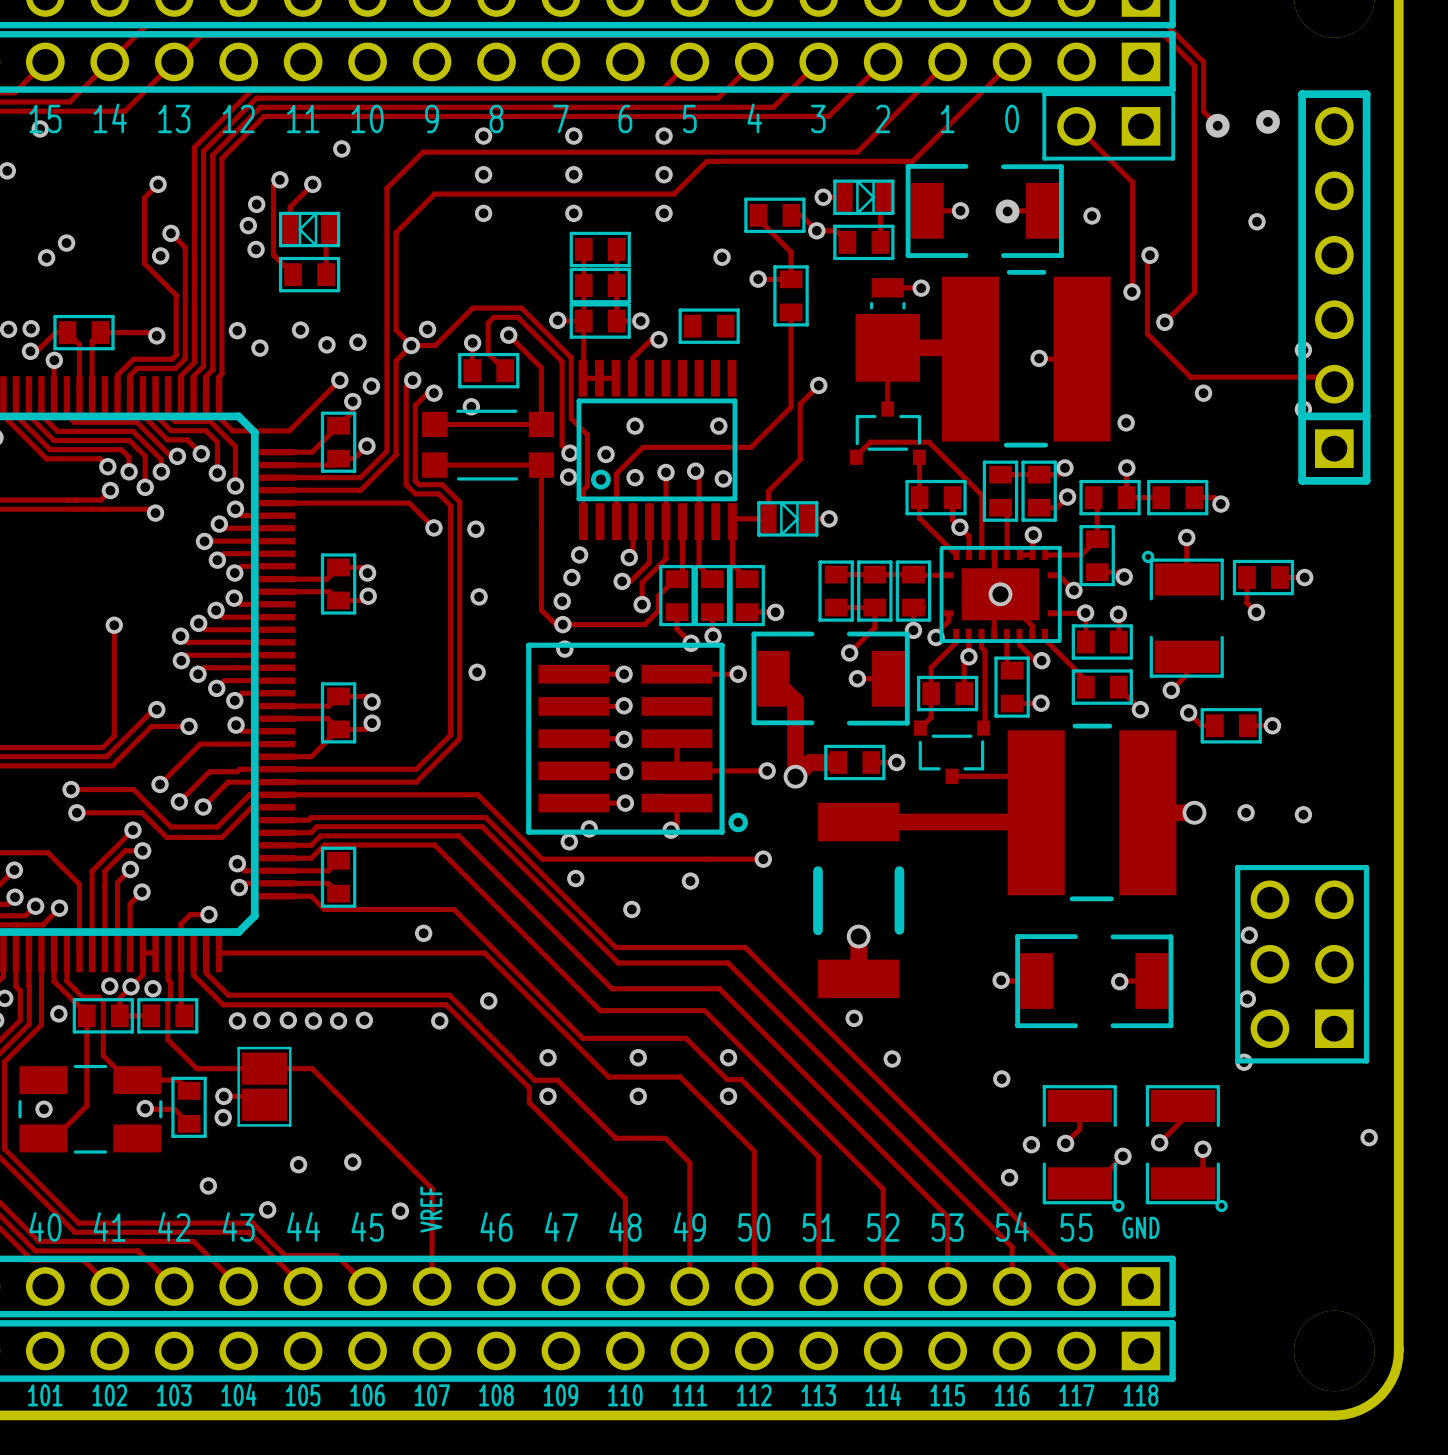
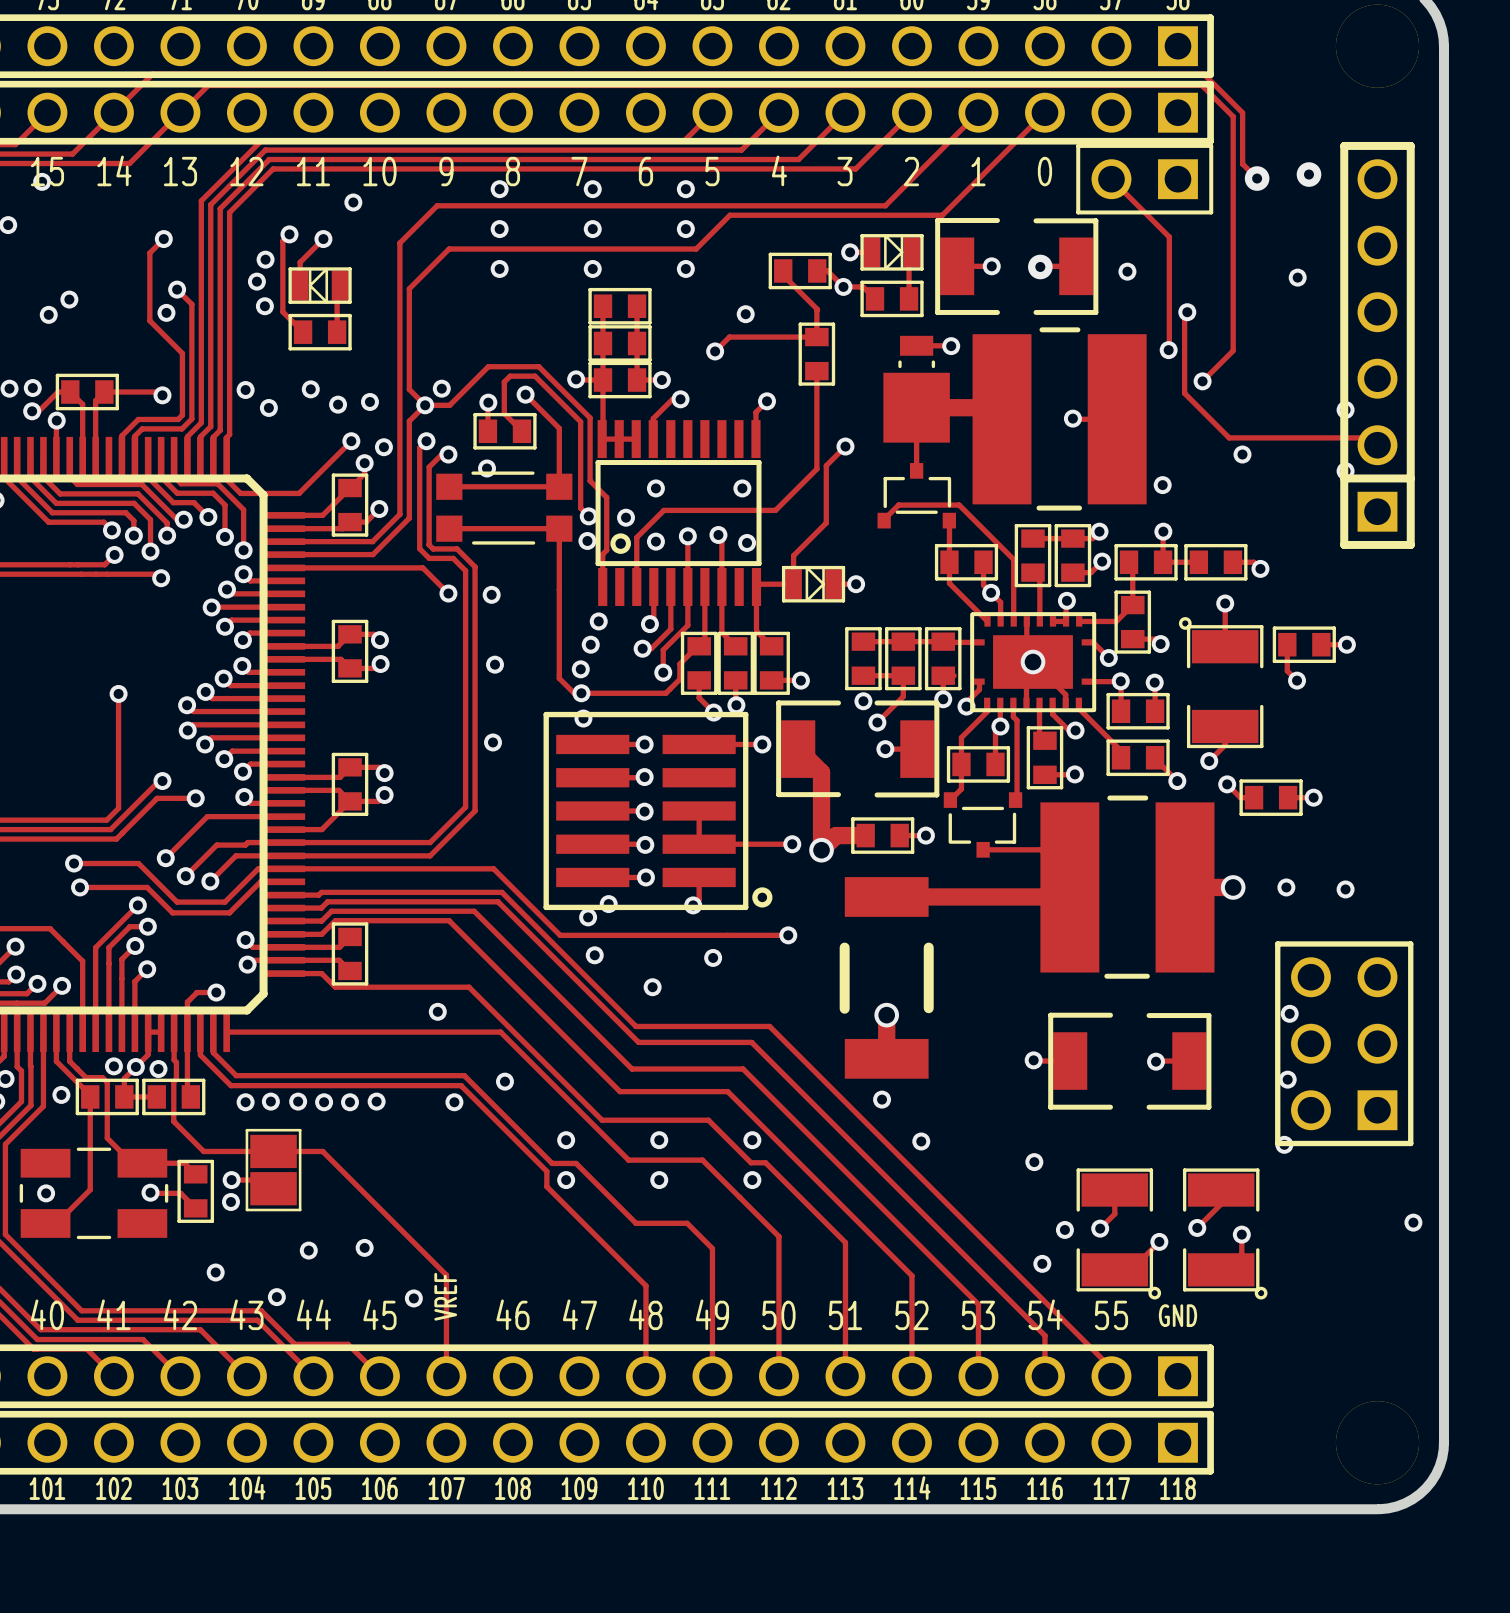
track: none -> (783, 337) (729, 337) (715, 351)
via: (758, 279) -> none
via: none -> (715, 351)
part: (709, 326) -> none
track: none -> (766, 401) (755, 412) (755, 424)
via: none -> (766, 401)
via: none -> (863, 701)

